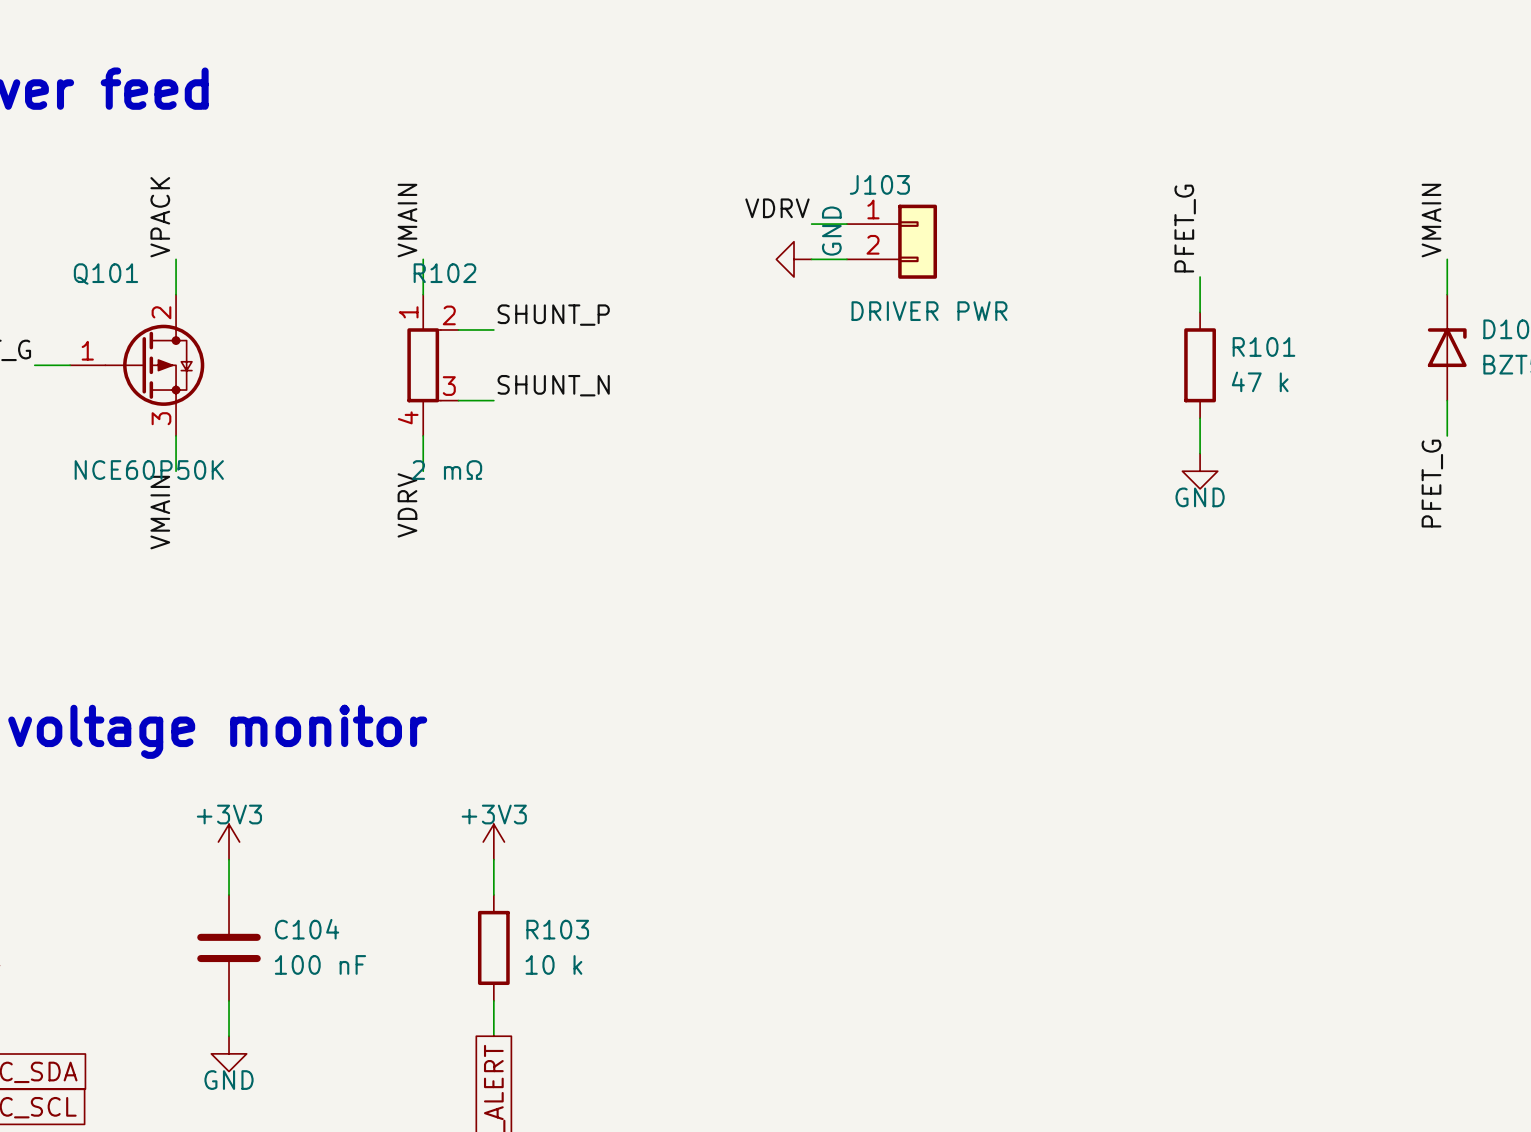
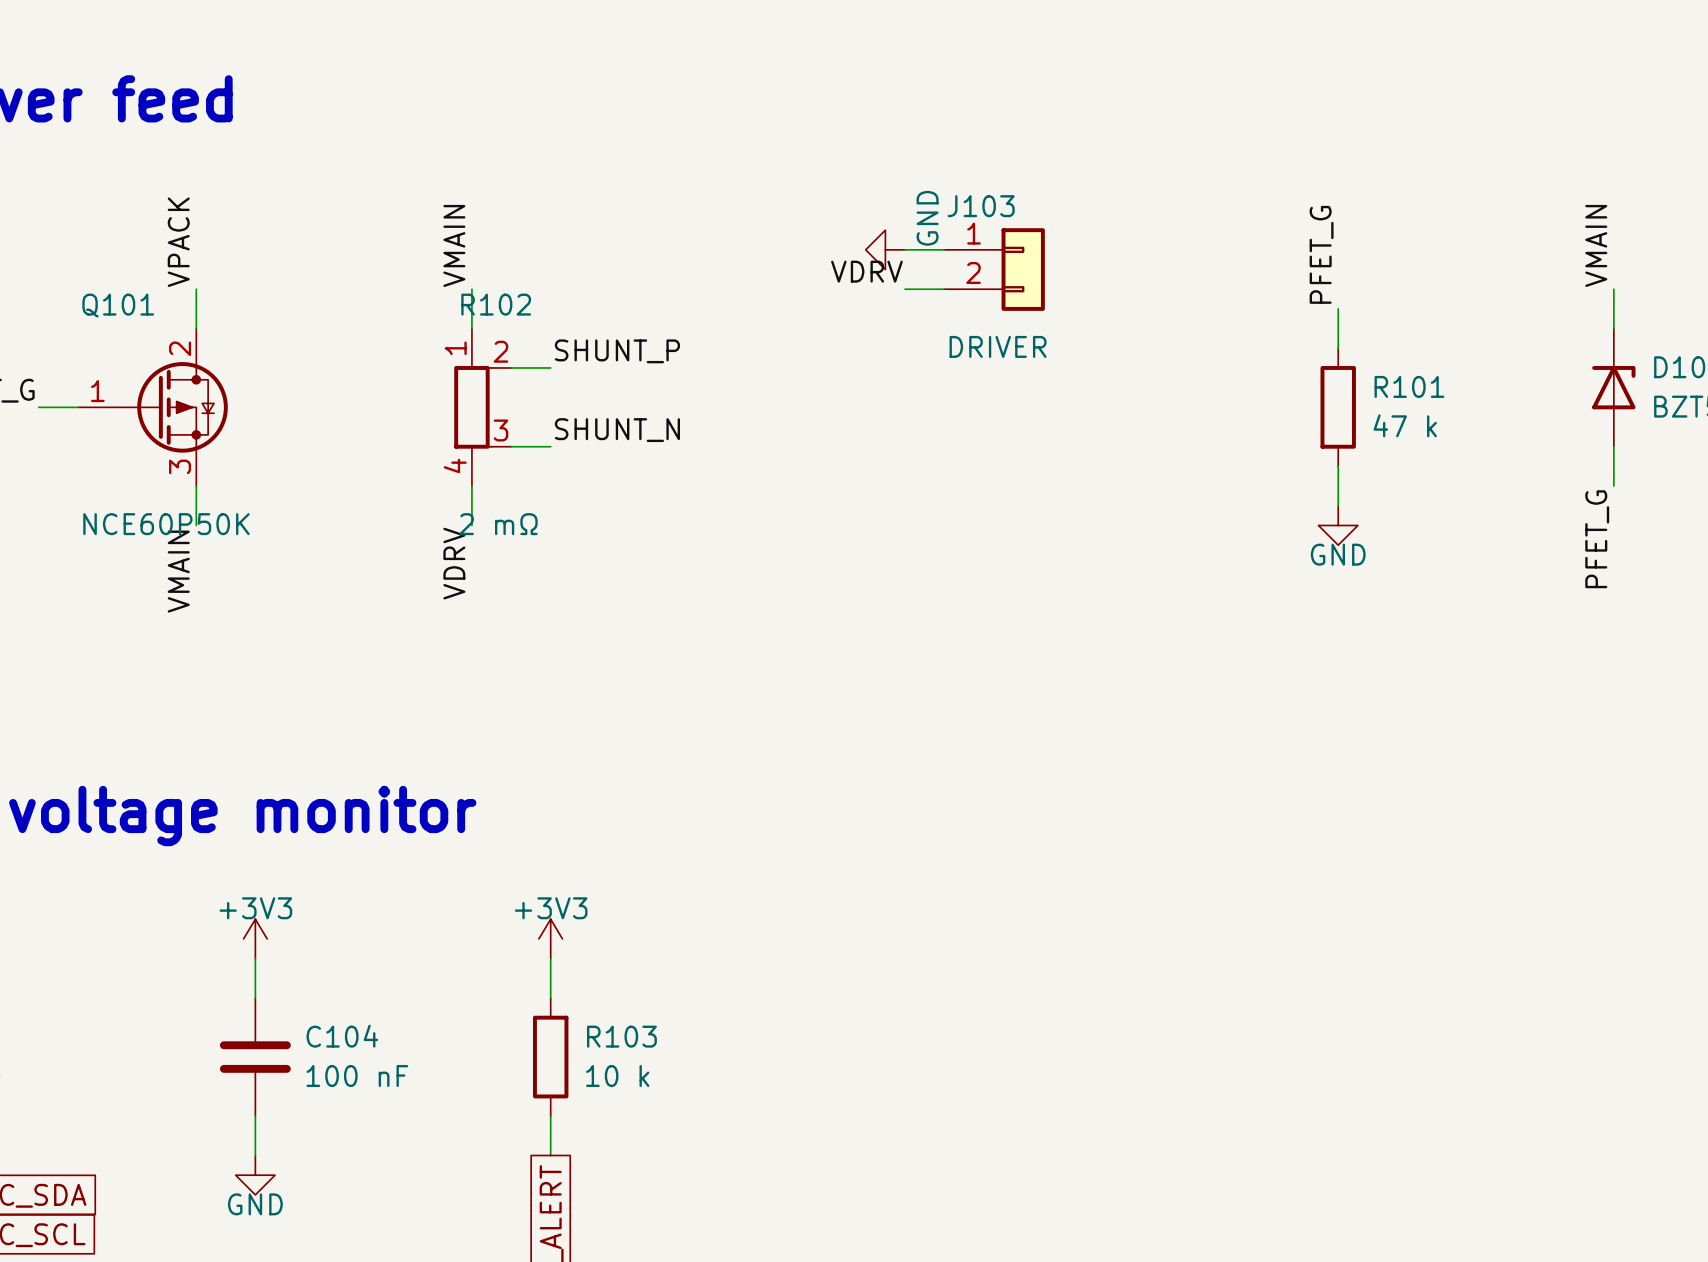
label position: VDRV (777, 208) -> VDRV (866, 271)
power symbol position: GND (793, 259) -> GND (885, 249)
J103 value: DRIVER PWR (929, 311) -> DRIVER (998, 346)

